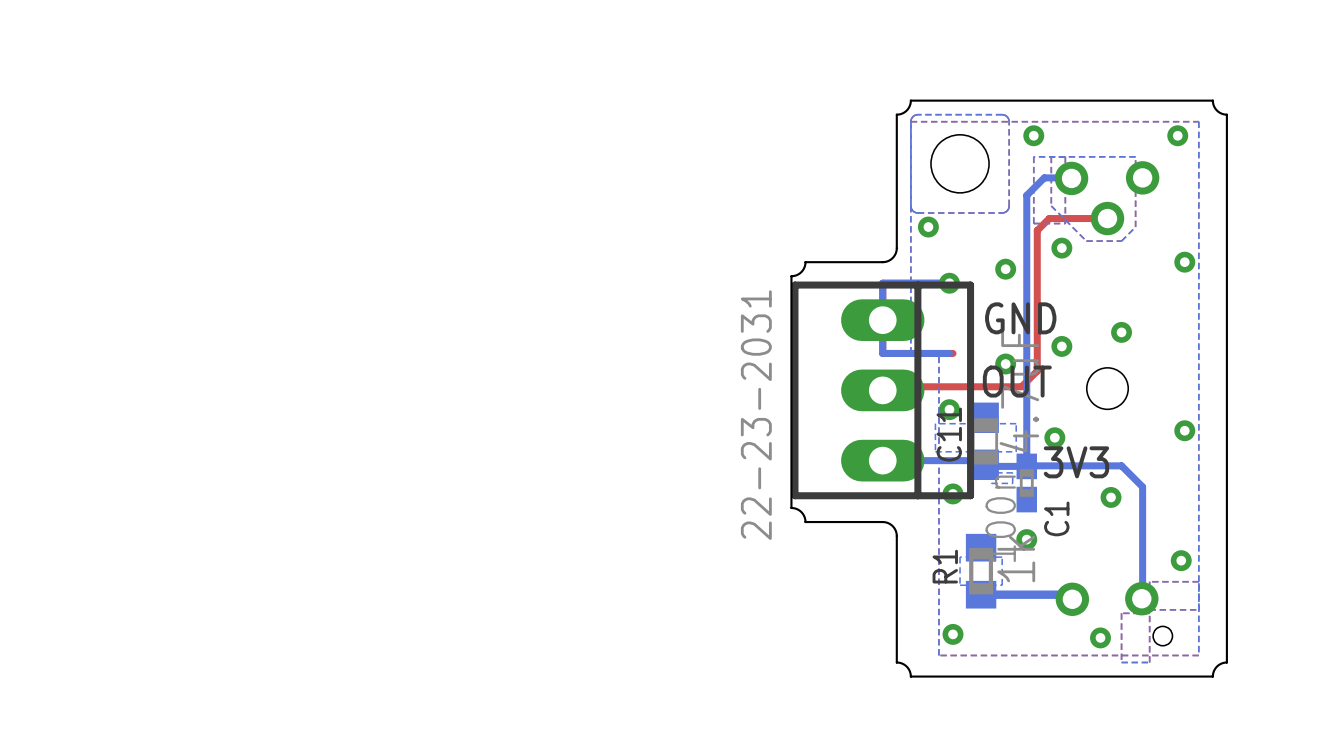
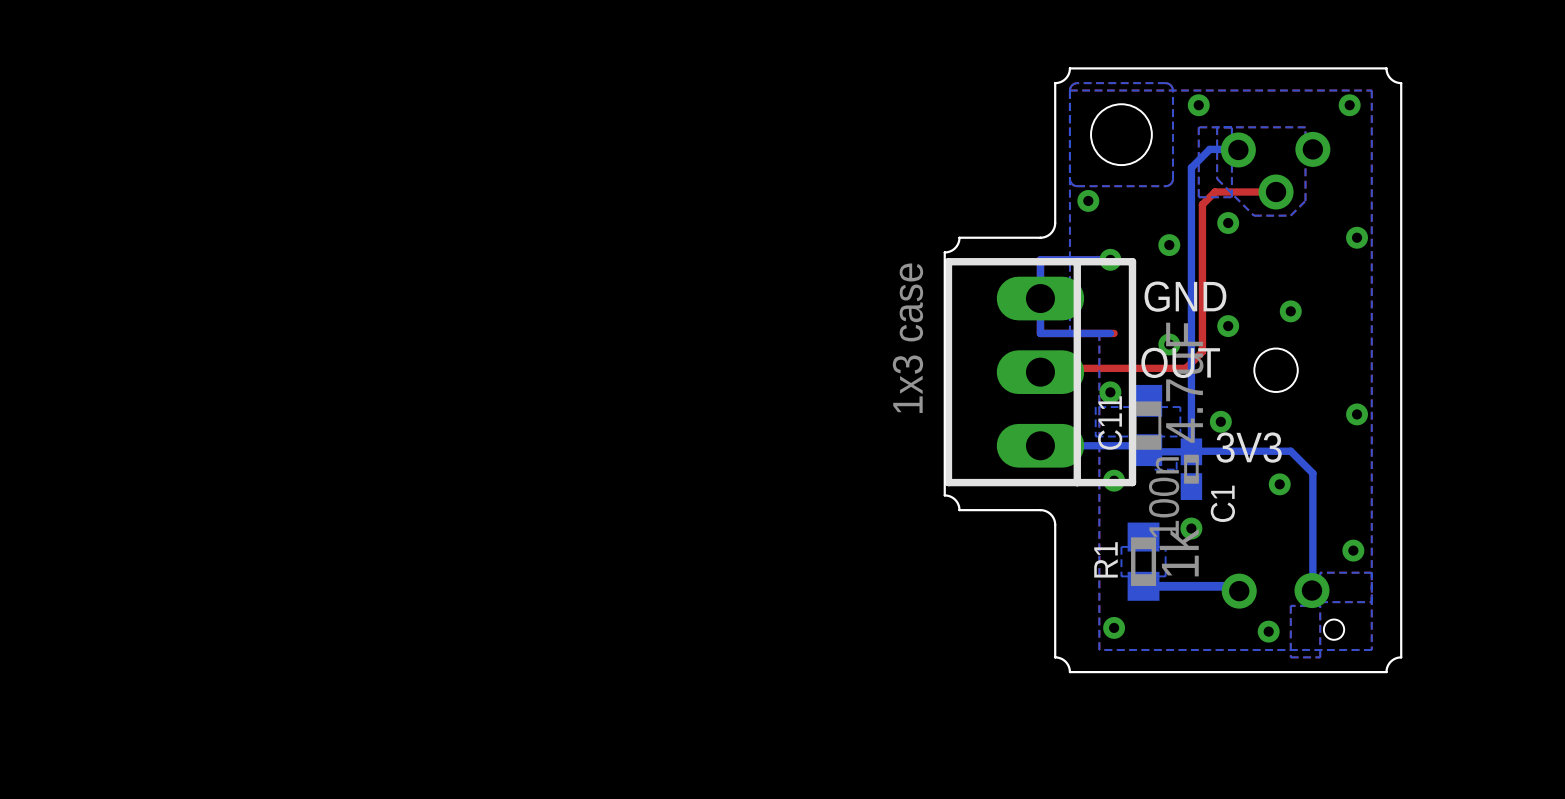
part value: 22-23-2031 (756, 415) -> 1x3 case (907, 338)

